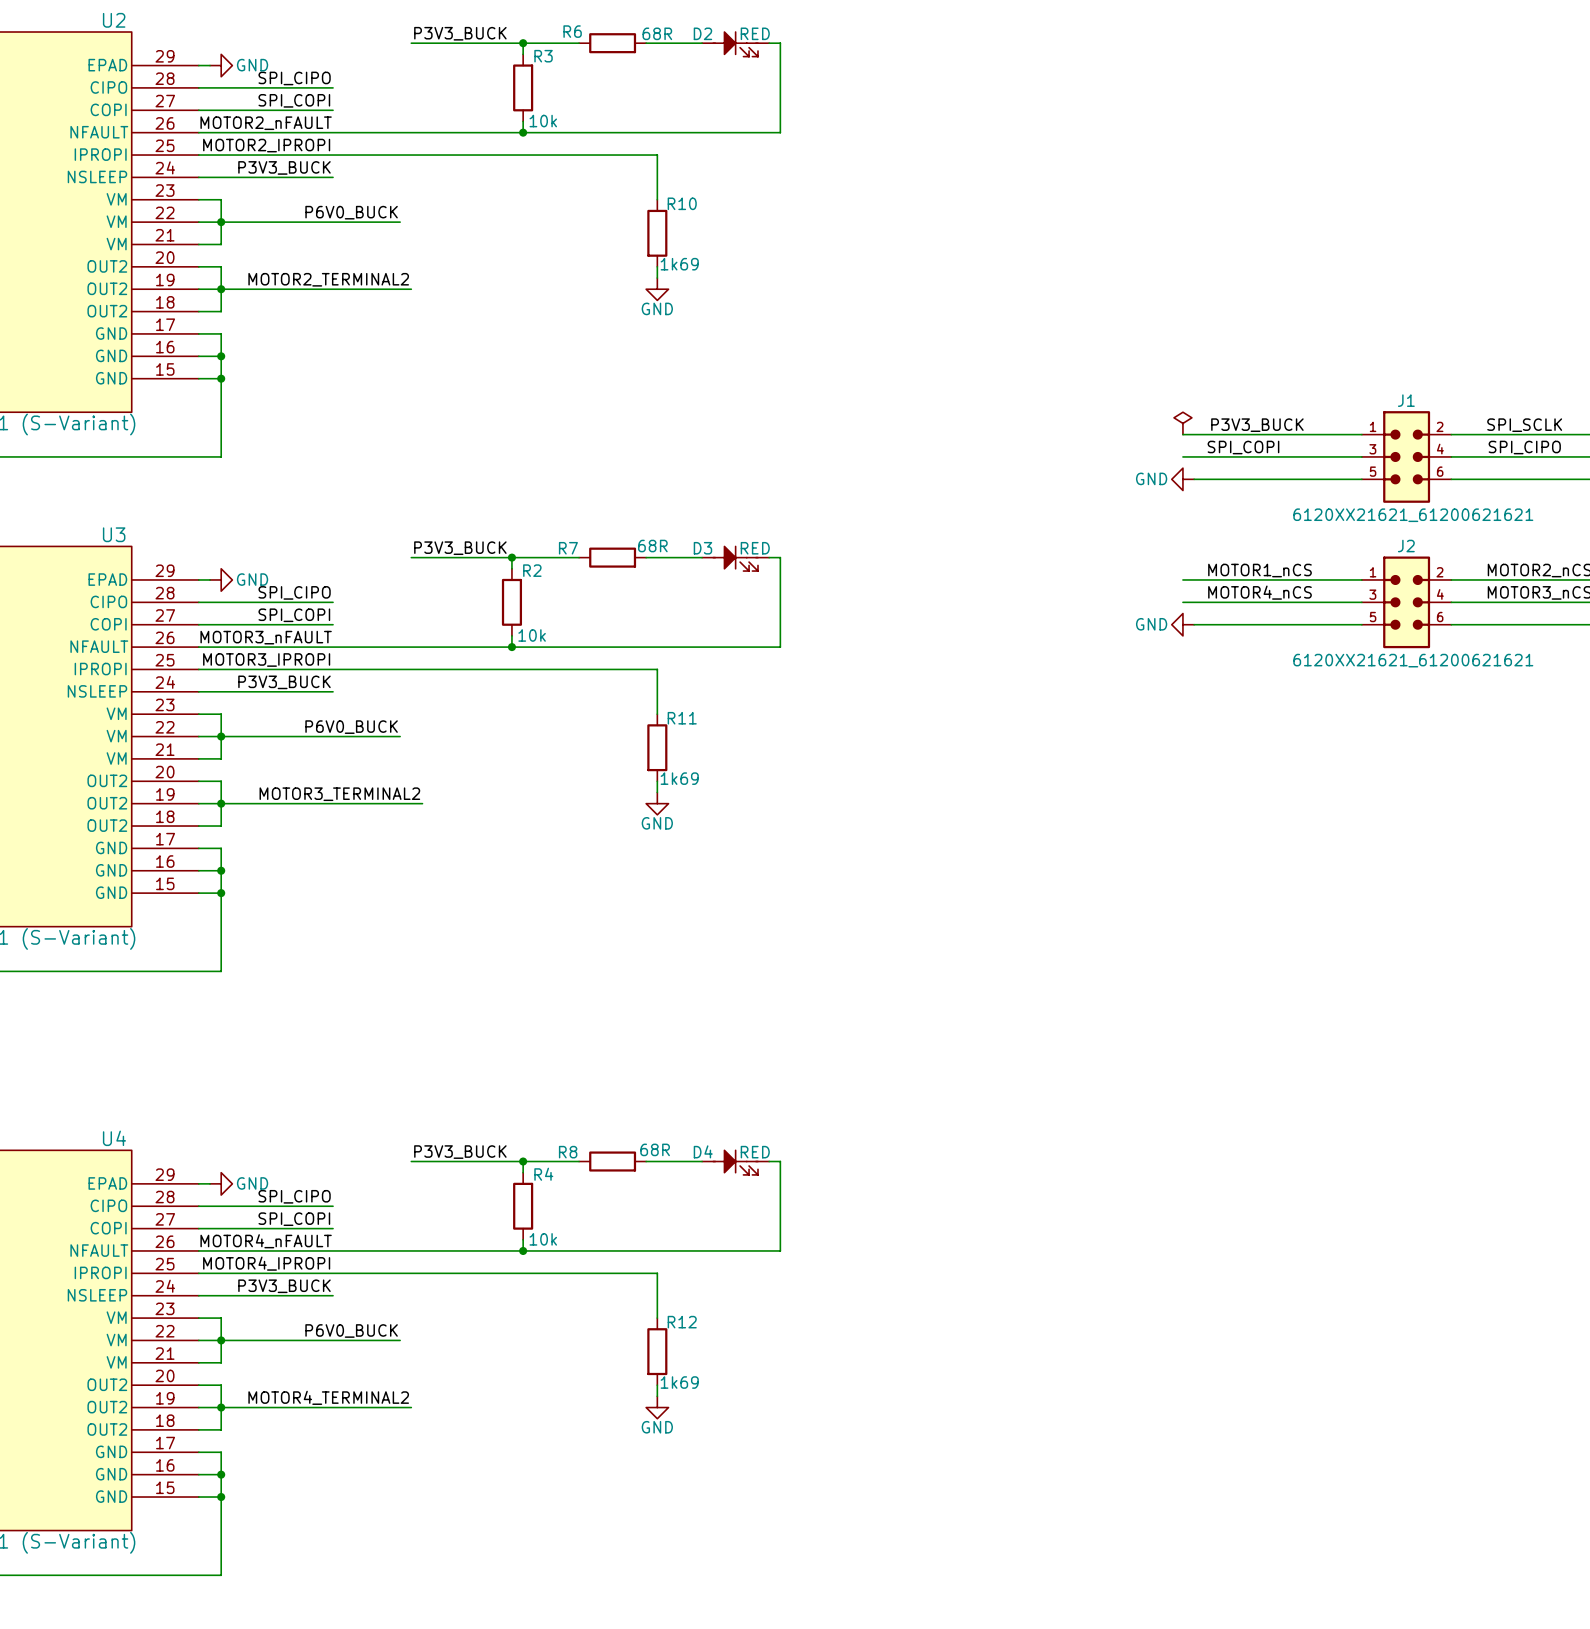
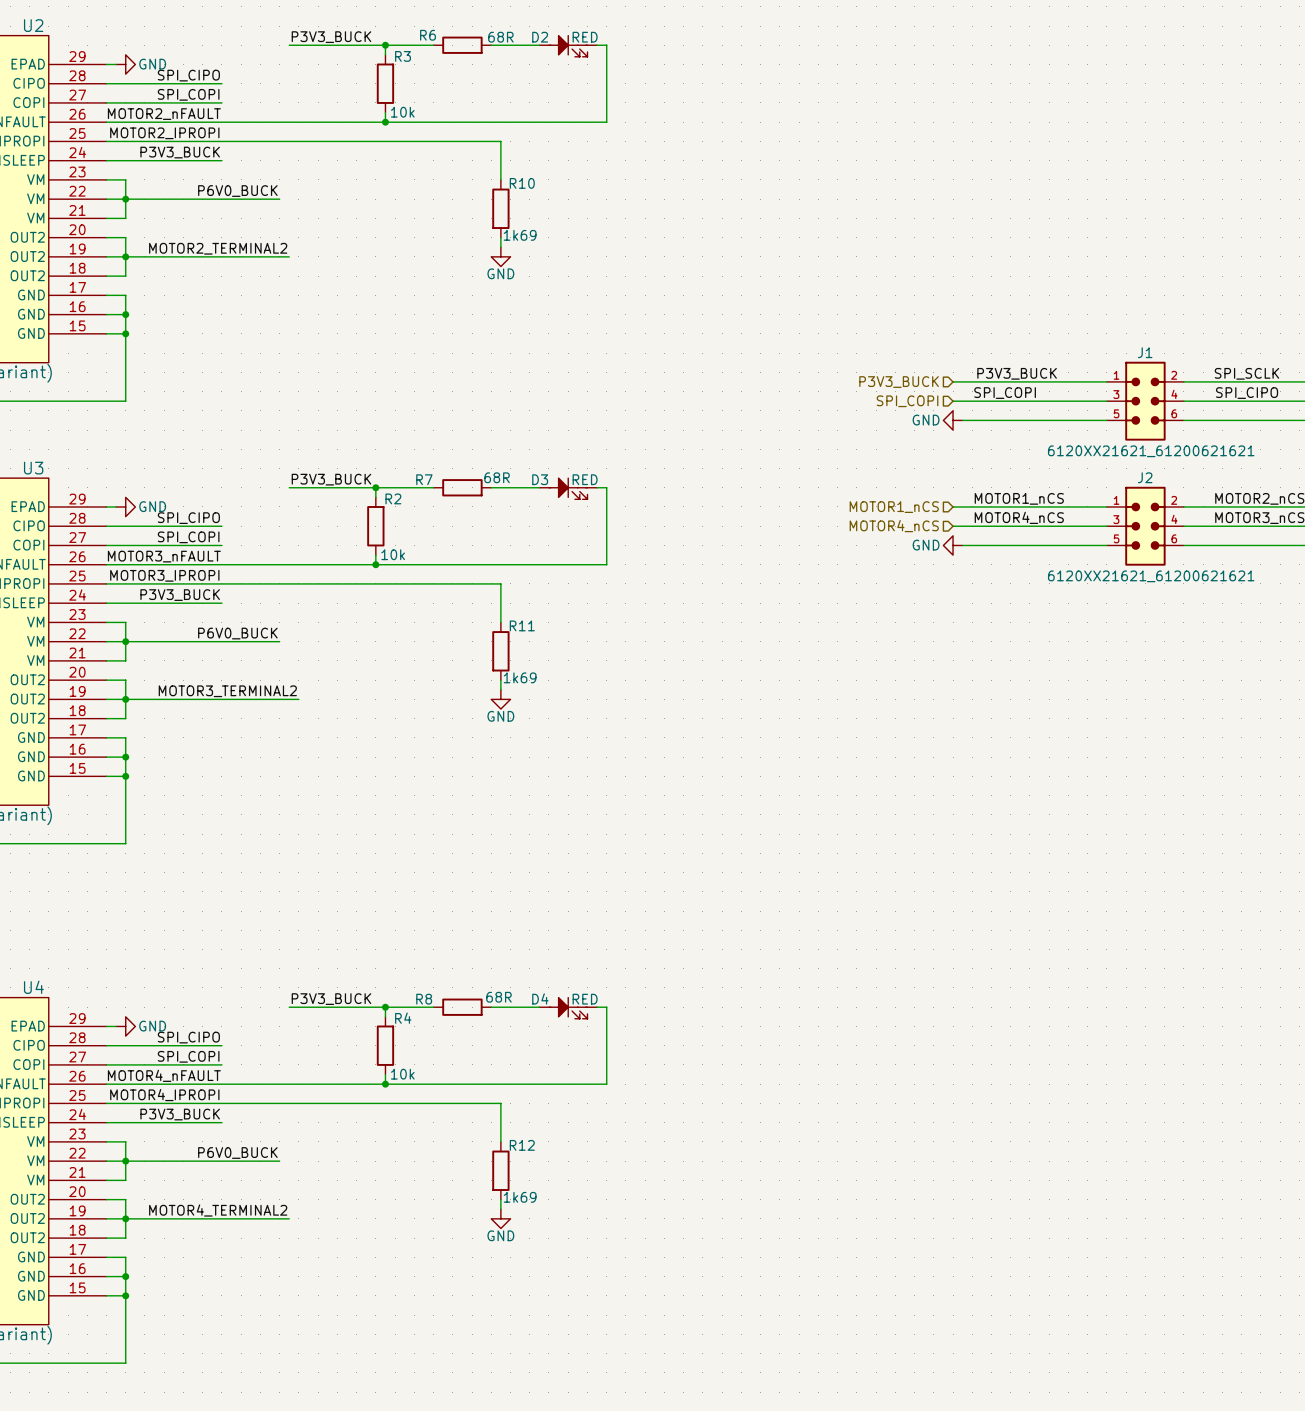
power symbol: (1182, 423) -> none
hierarchical label: none -> P3V3_BUCK (899, 382)
hierarchical label: none -> SPI_COPI (907, 401)
hierarchical label: none -> MOTOR1_nCS (894, 507)
hierarchical label: none -> MOTOR4_nCS (894, 526)

